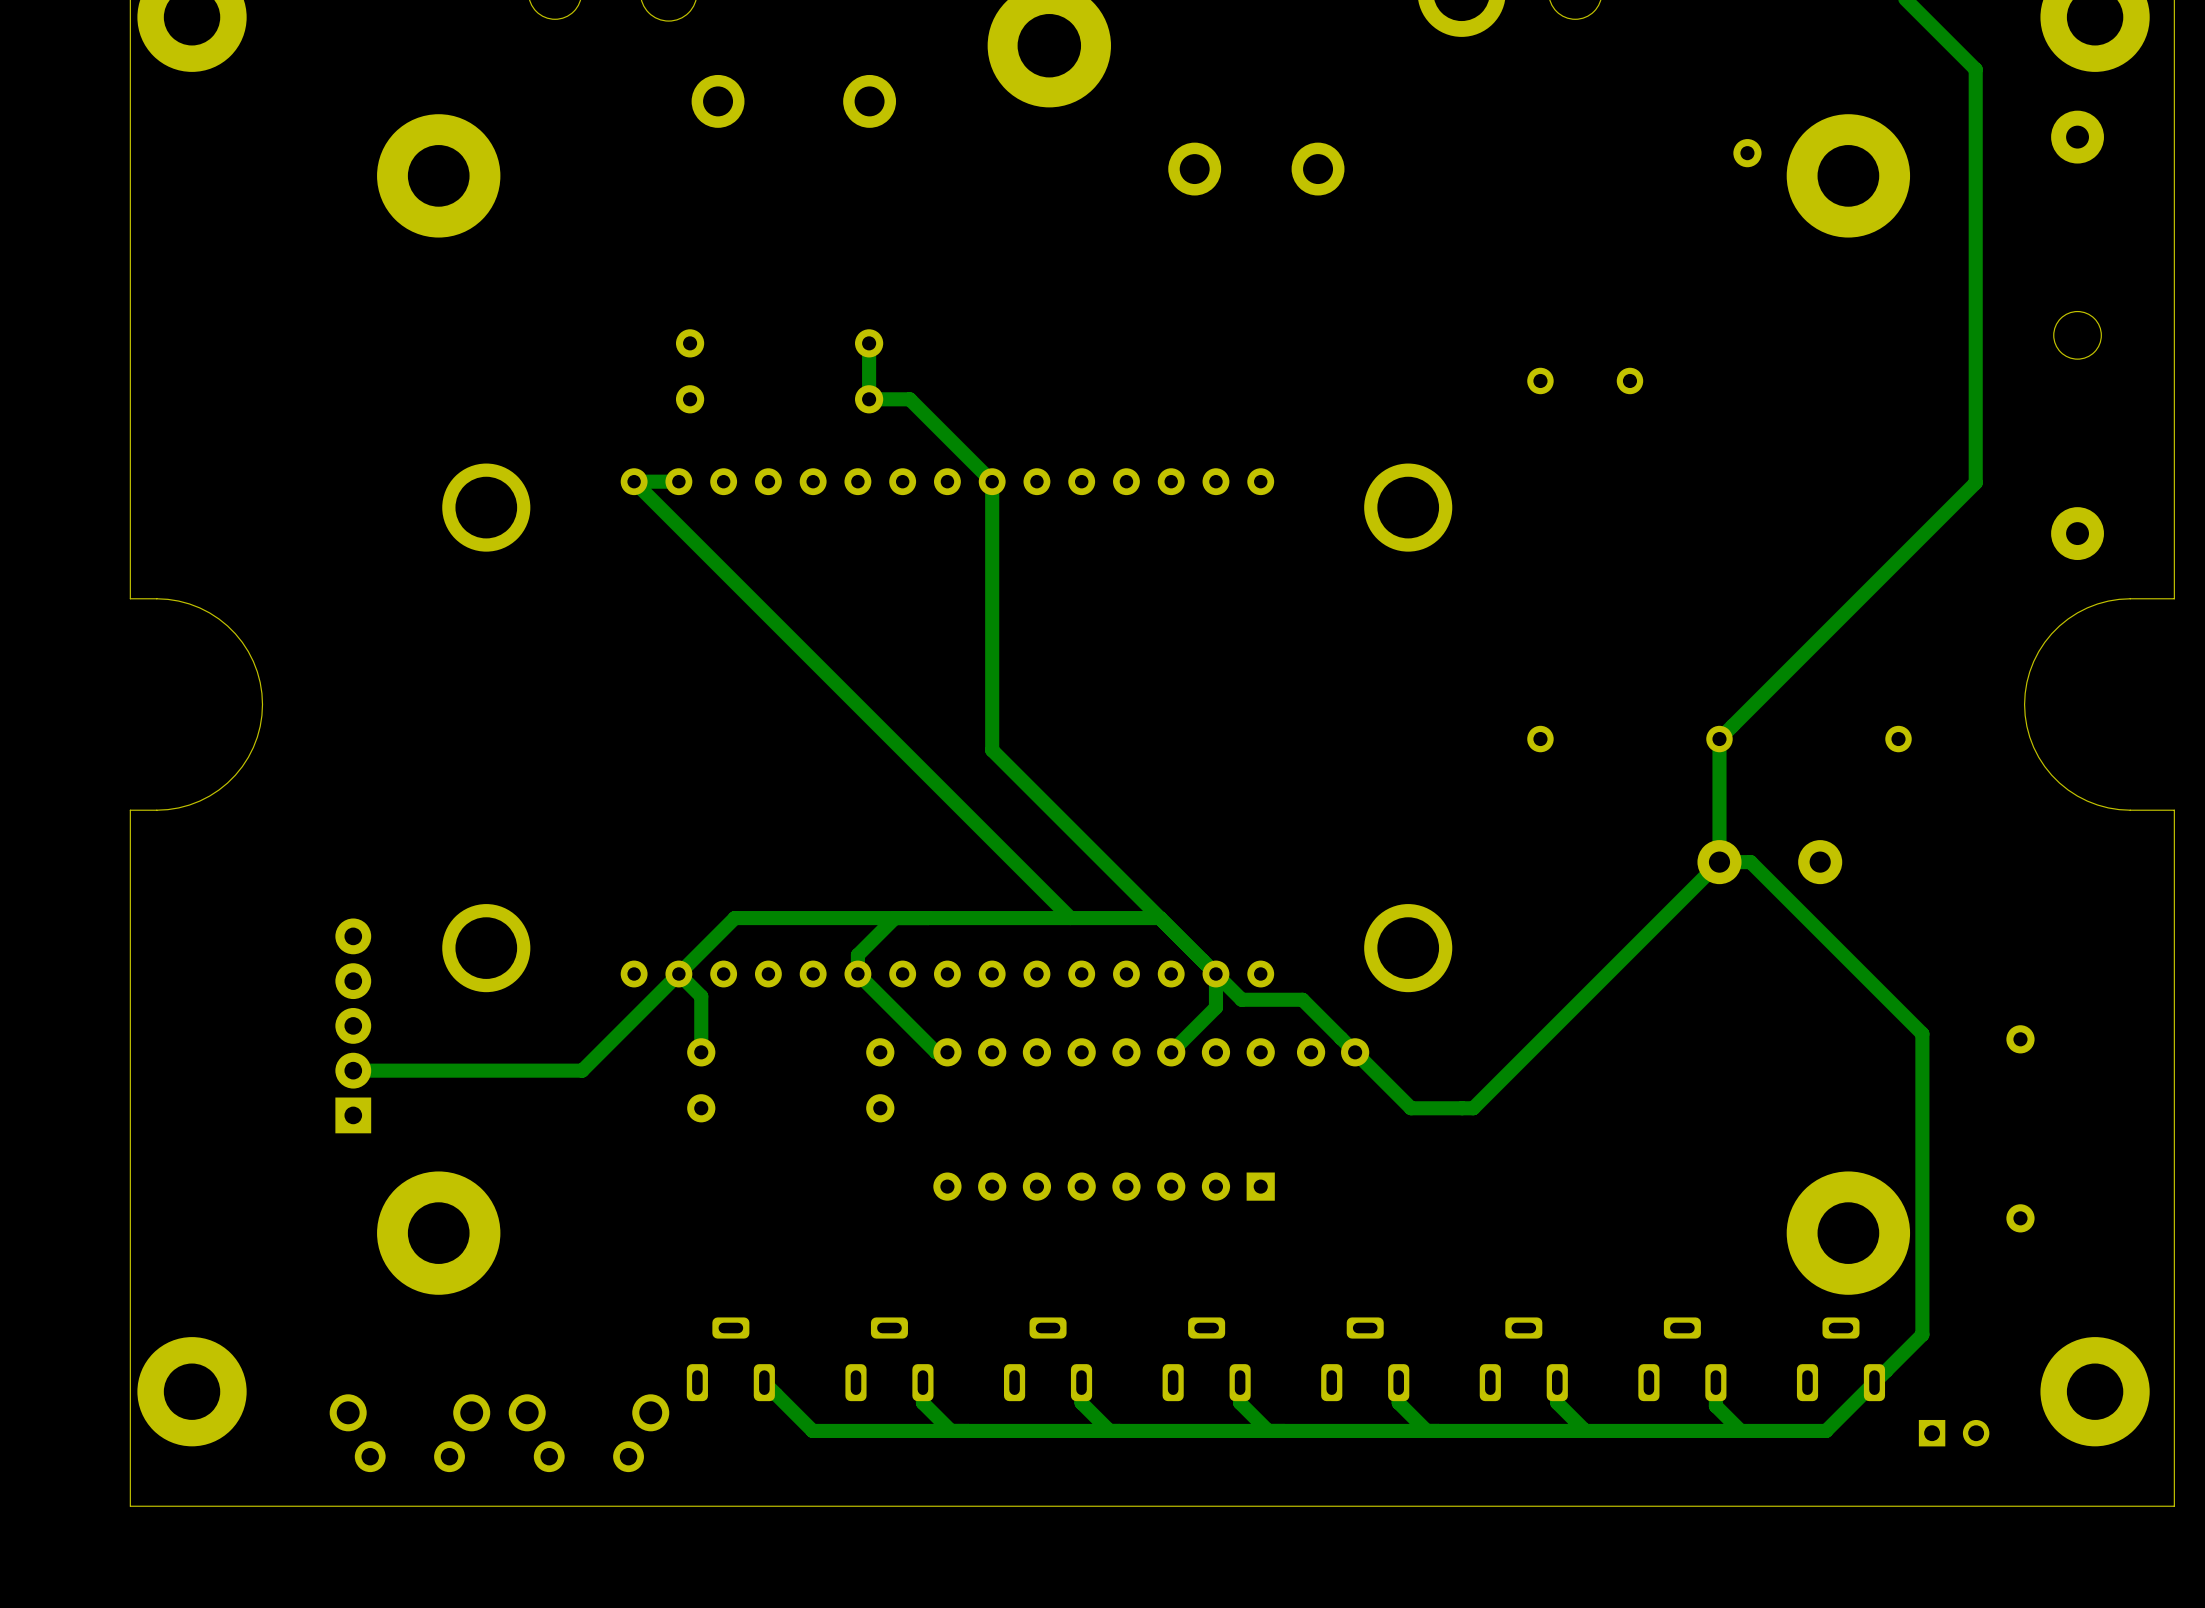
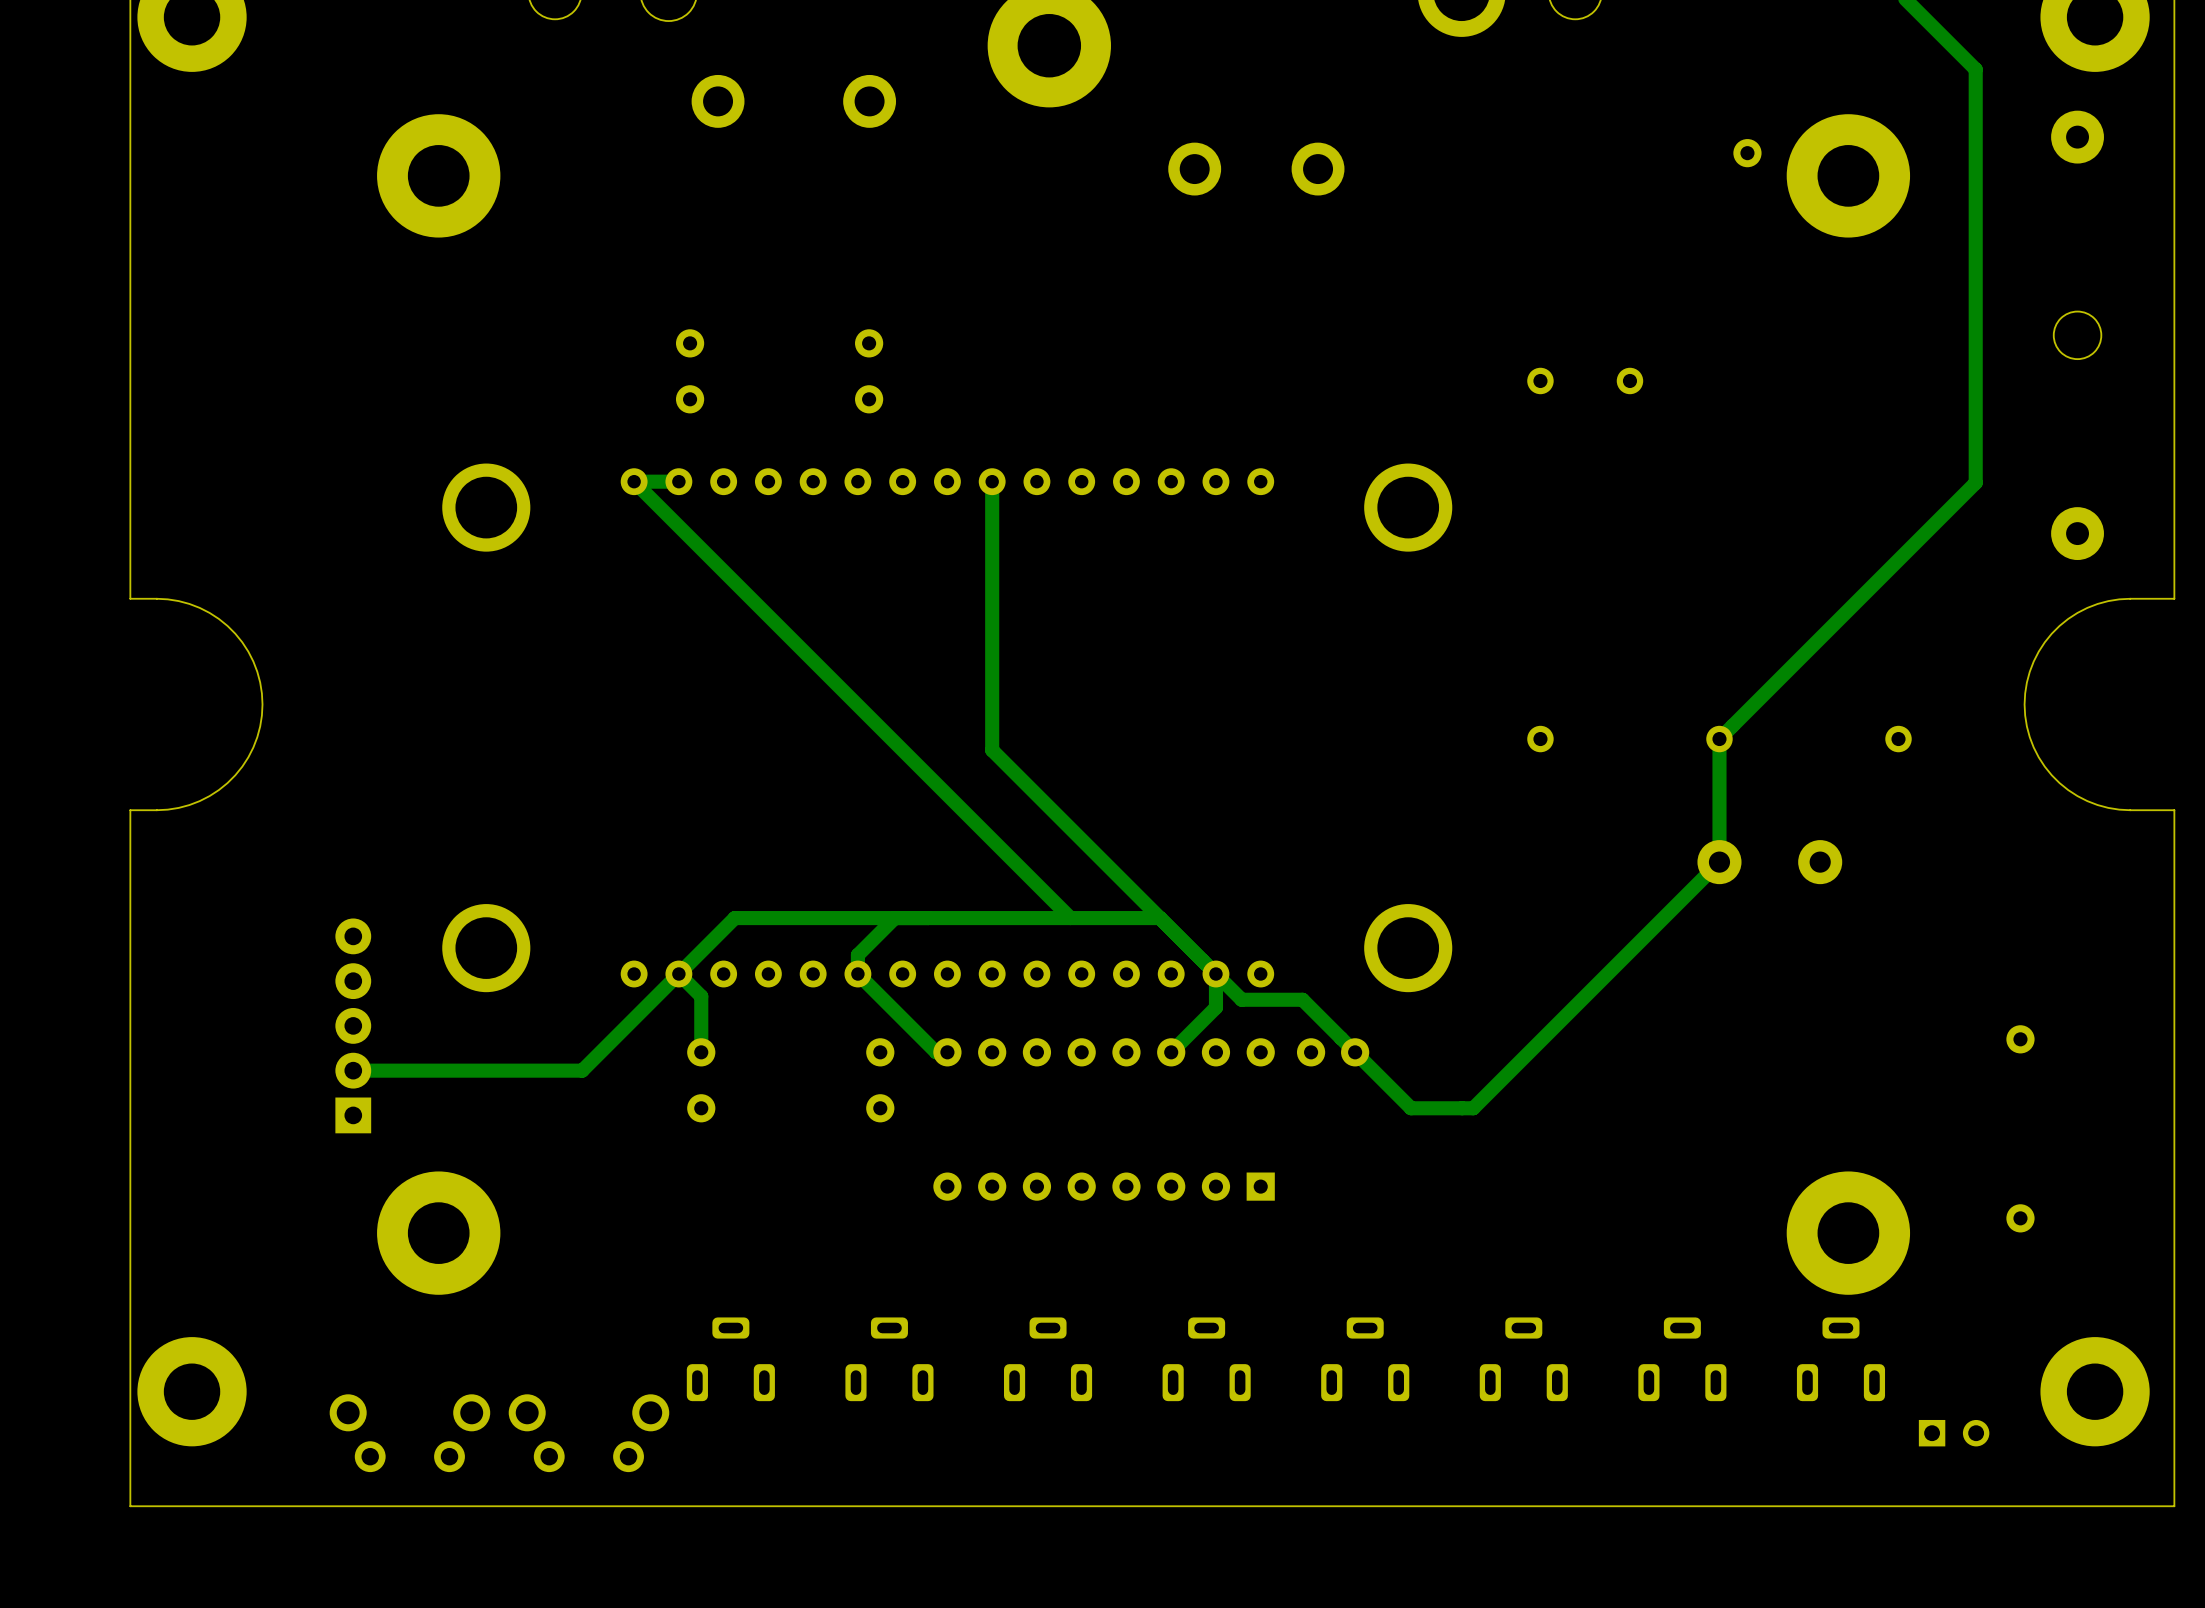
track: (869, 343) (869, 399) (909, 399) (992, 481) -> none
track: (1719, 862) (1750, 862) (1922, 1033) (1922, 1334) (1826, 1430) (812, 1430) (764, 1382) -> none
track: (922, 1382) (922, 1402) (950, 1430) -> none
track: (1081, 1382) (1081, 1402) (1109, 1430) -> none
track: (1240, 1382) (1240, 1402) (1268, 1430) -> none
track: (1398, 1382) (1398, 1402) (1426, 1430) -> none
track: (1557, 1382) (1557, 1402) (1585, 1430) -> none
track: (1715, 1382) (1715, 1406) (1740, 1430) -> none

